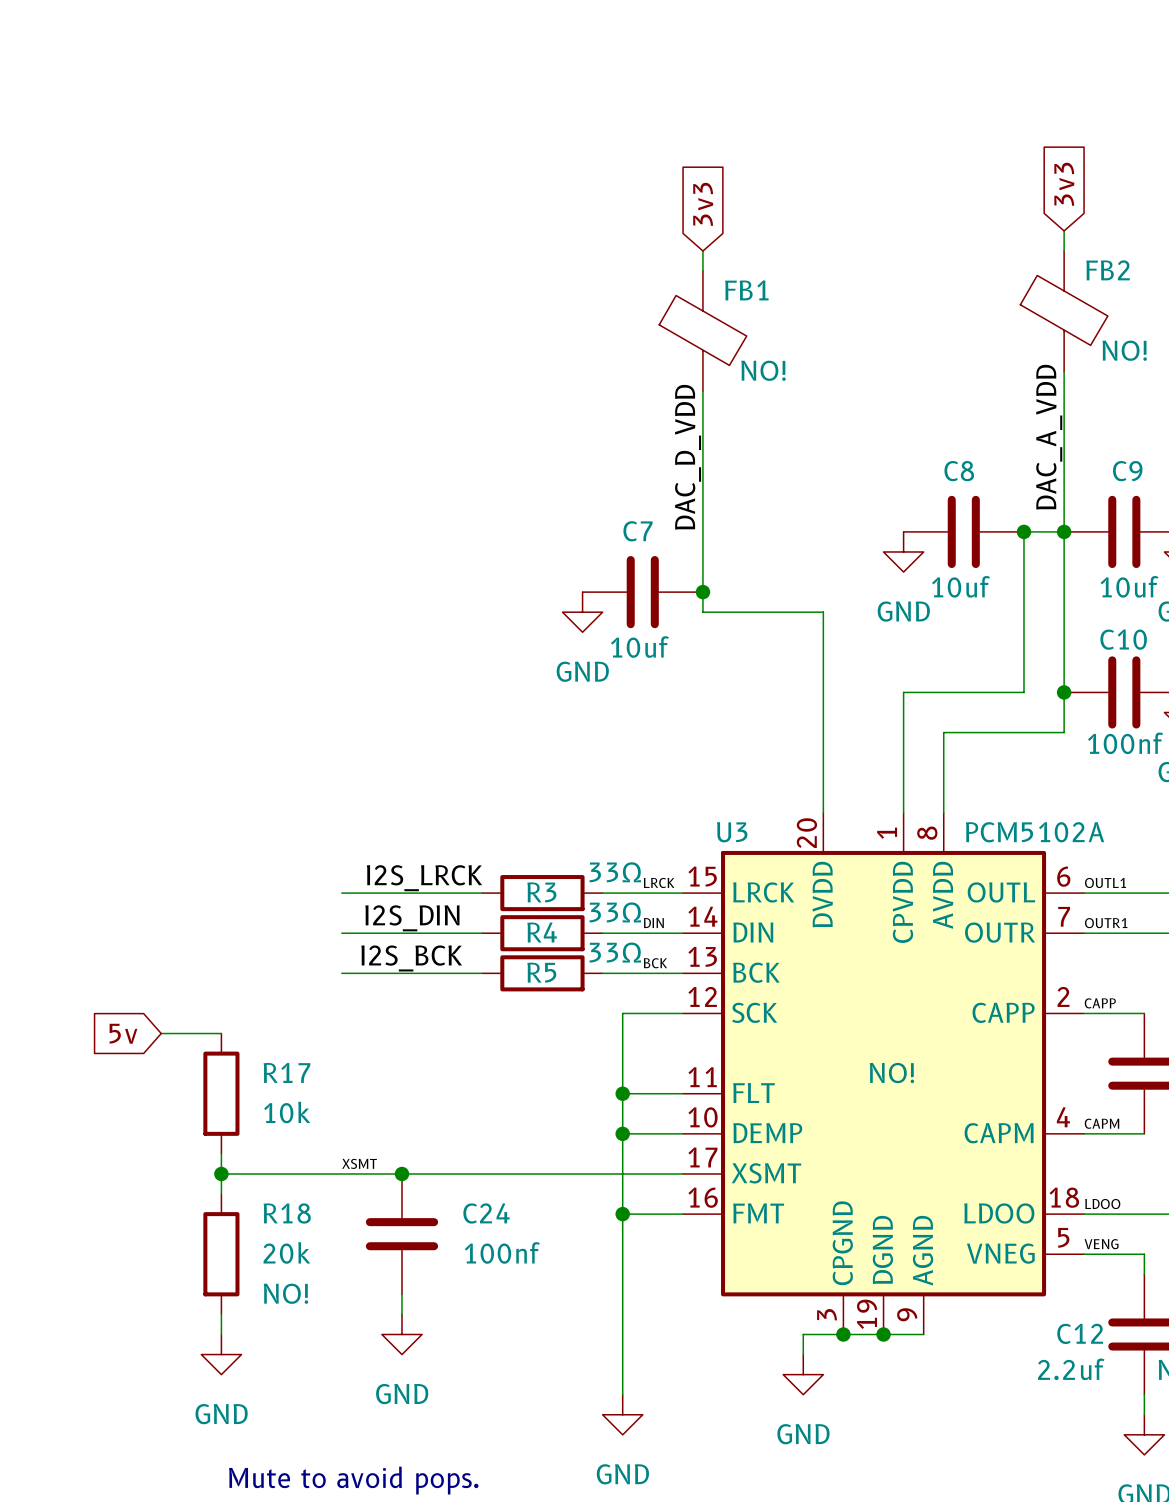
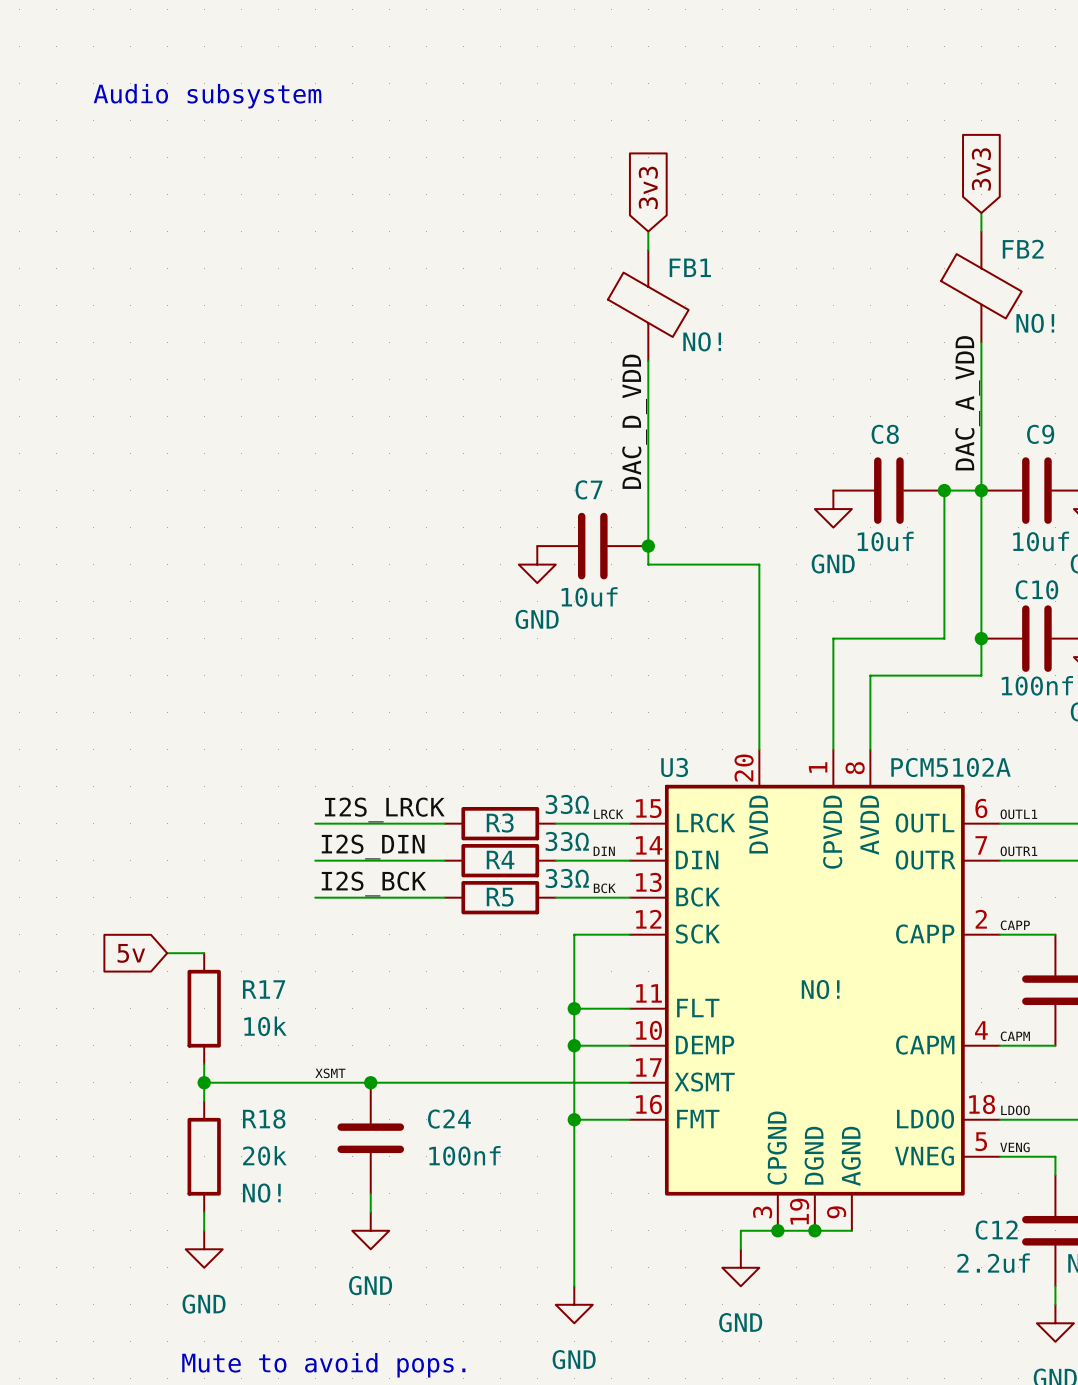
text: none -> Audio subsystem (207, 96)
global label position: 5v (123, 1033) -> 5v (131, 953)
wire: (161, 1033) (181, 1033) -> none

